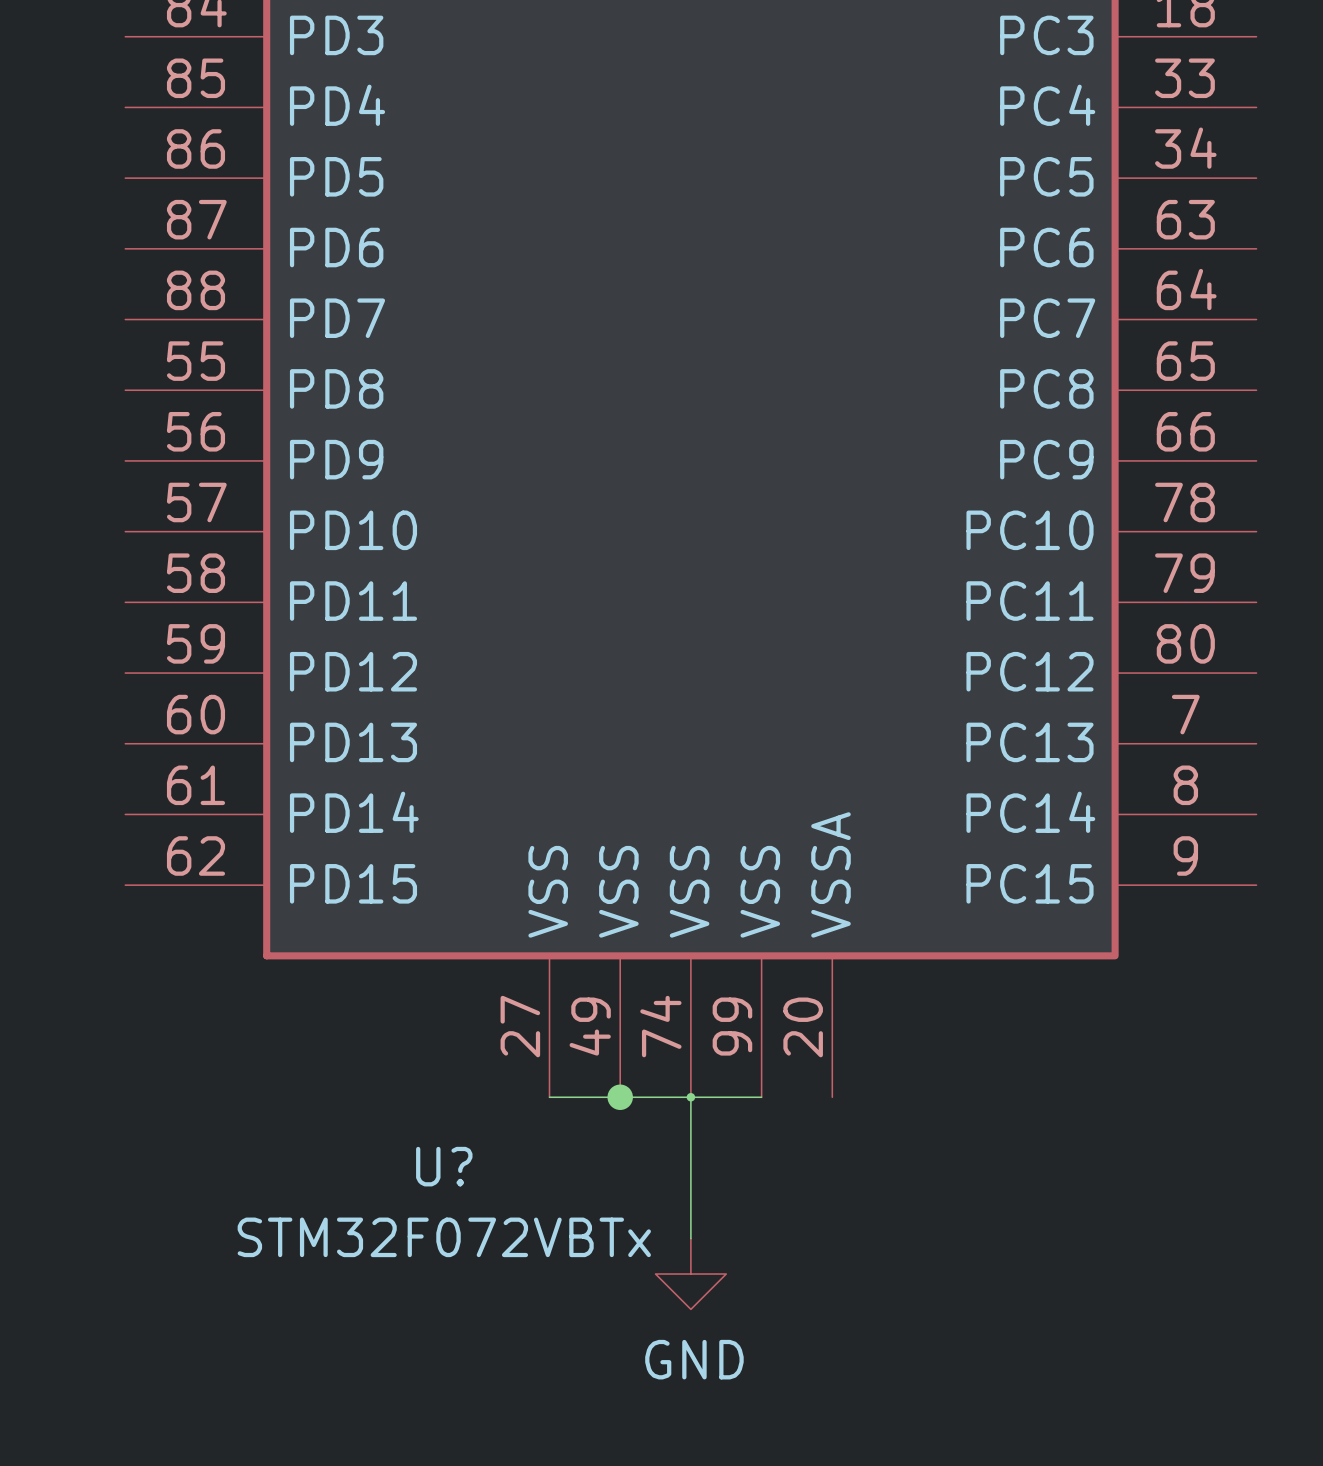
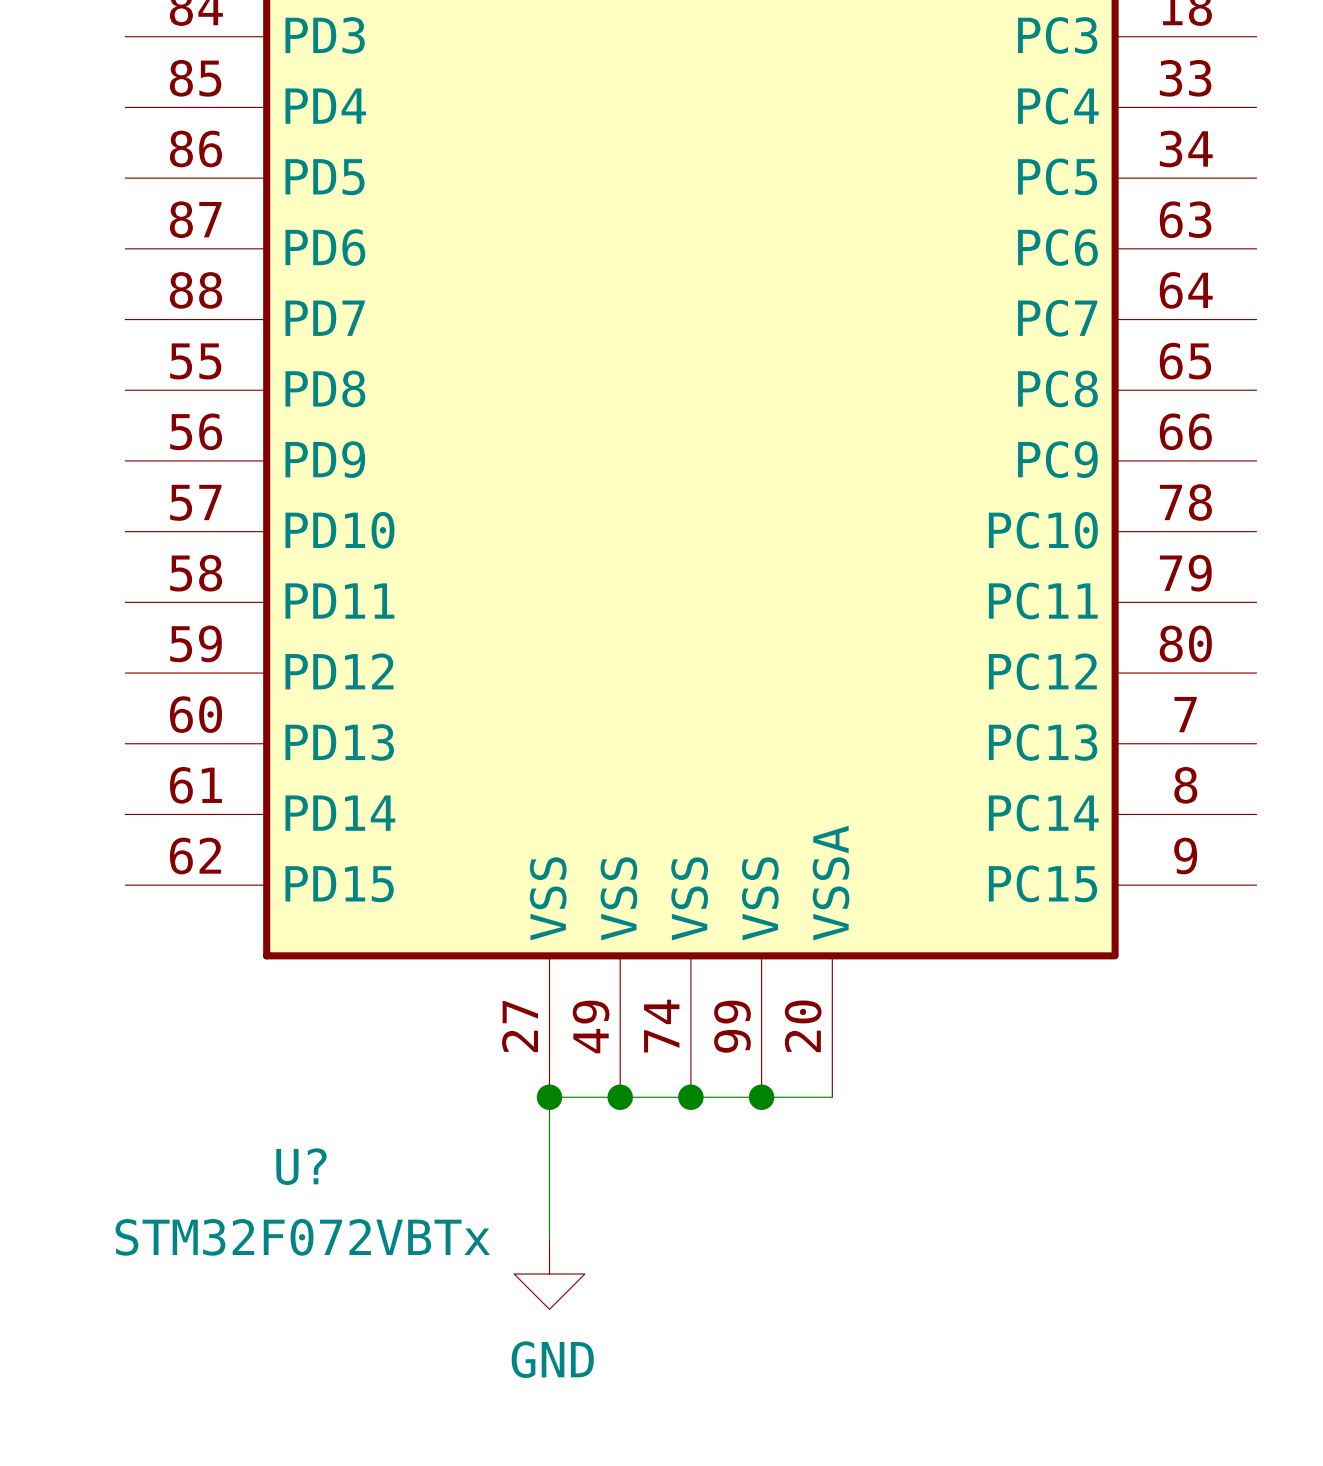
junction size: [686, 1093, 696, 1102] -> [678, 1084, 704, 1110]
junction: none -> (549, 1097)
wire: (690, 1097) (690, 1238) -> (549, 1097) (549, 1238)
wire: none -> (761, 1097) (832, 1097)
junction: none -> (761, 1097)
U? name position: U? (444, 1166) -> U? (301, 1166)
U? value position: STM32F072VBTx (444, 1237) -> STM32F072VBTx (302, 1237)
power symbol position: GND (690, 1274) -> GND (549, 1274)

